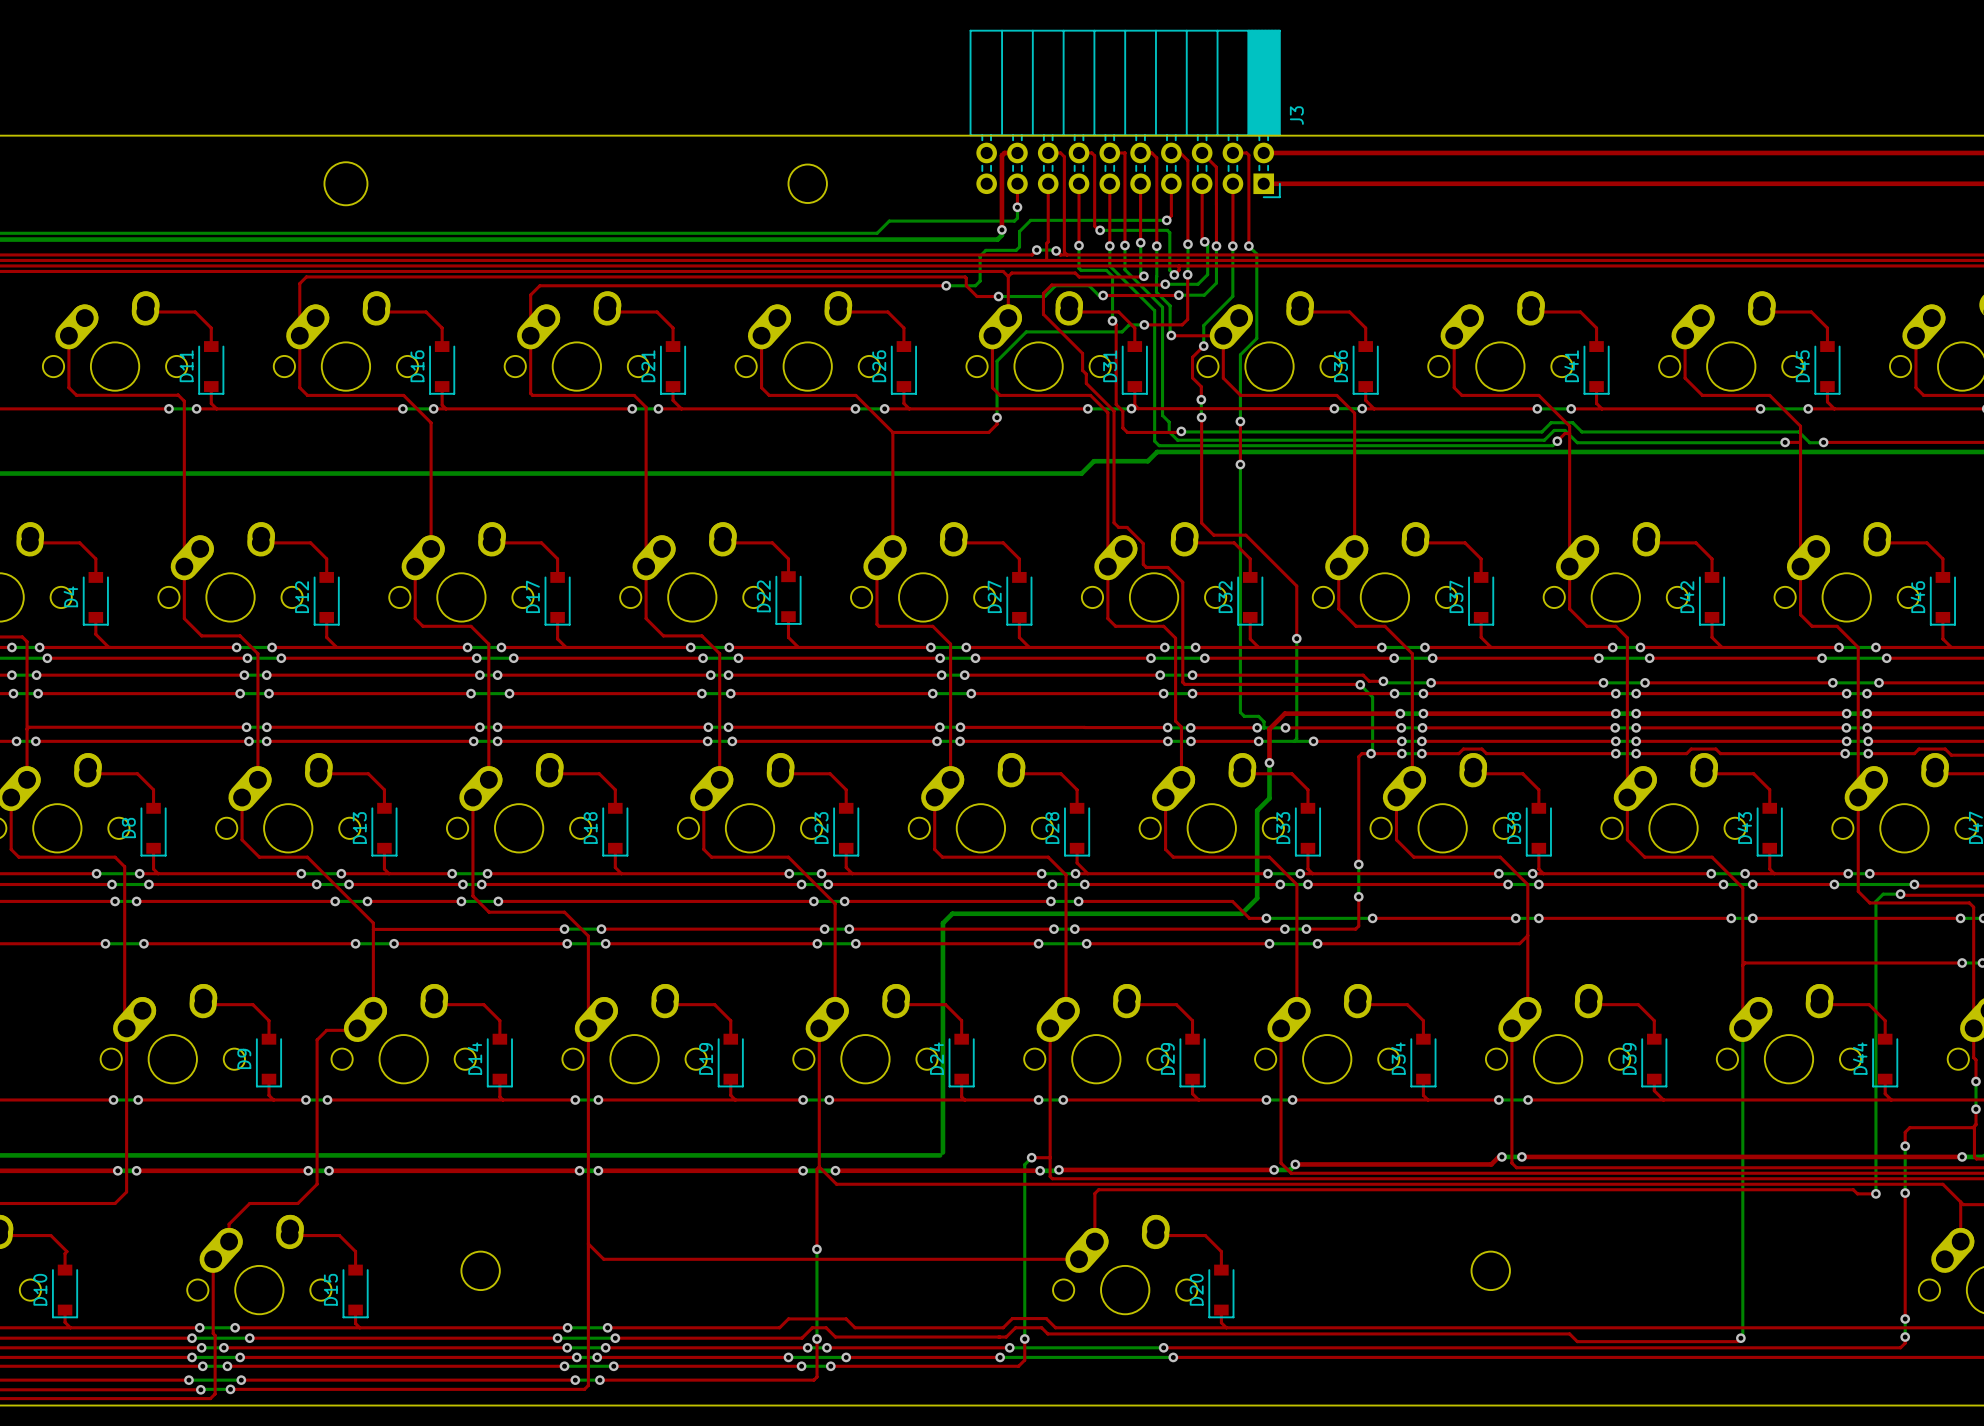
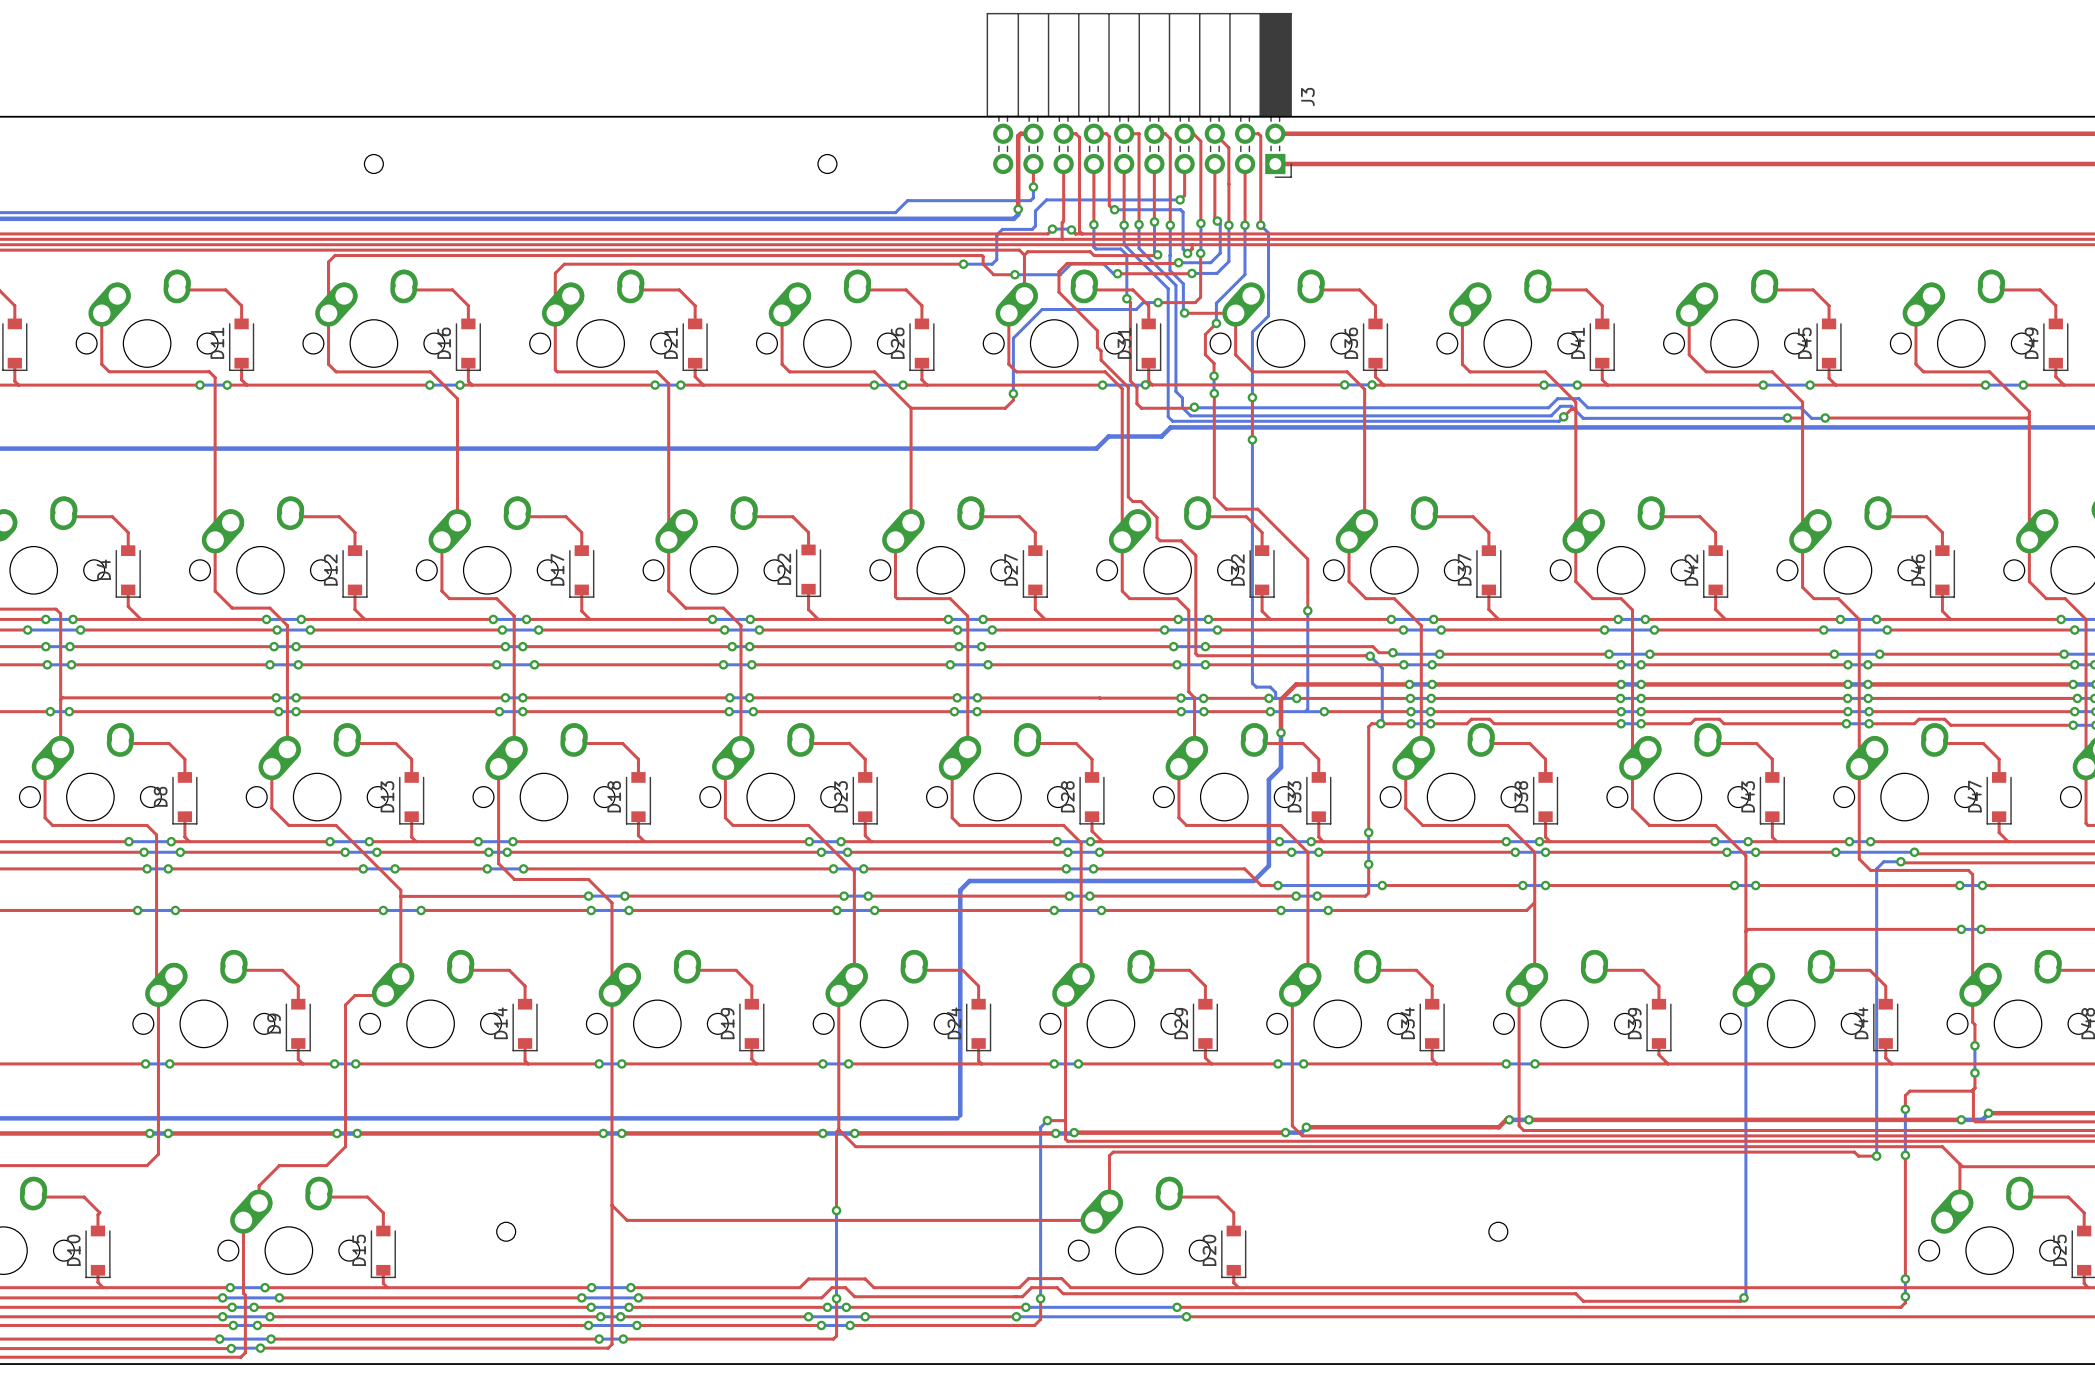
round board edge size: [323, 161, 369, 206] -> [363, 153, 384, 175]
round board edge size: [787, 163, 828, 204] -> [817, 153, 838, 175]
round board edge size: [460, 1250, 501, 1291] -> [496, 1221, 517, 1242]
round board edge size: [1470, 1250, 1511, 1291] -> [1488, 1221, 1509, 1242]

